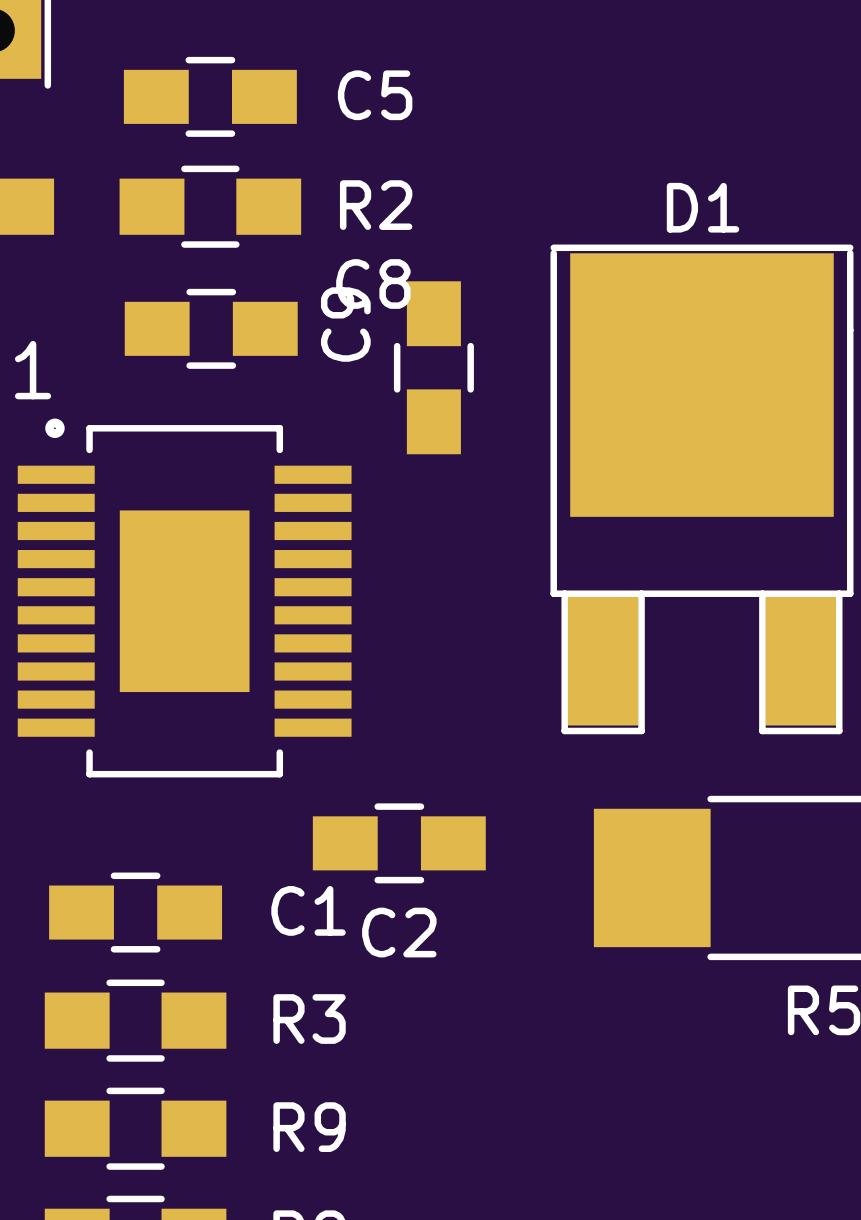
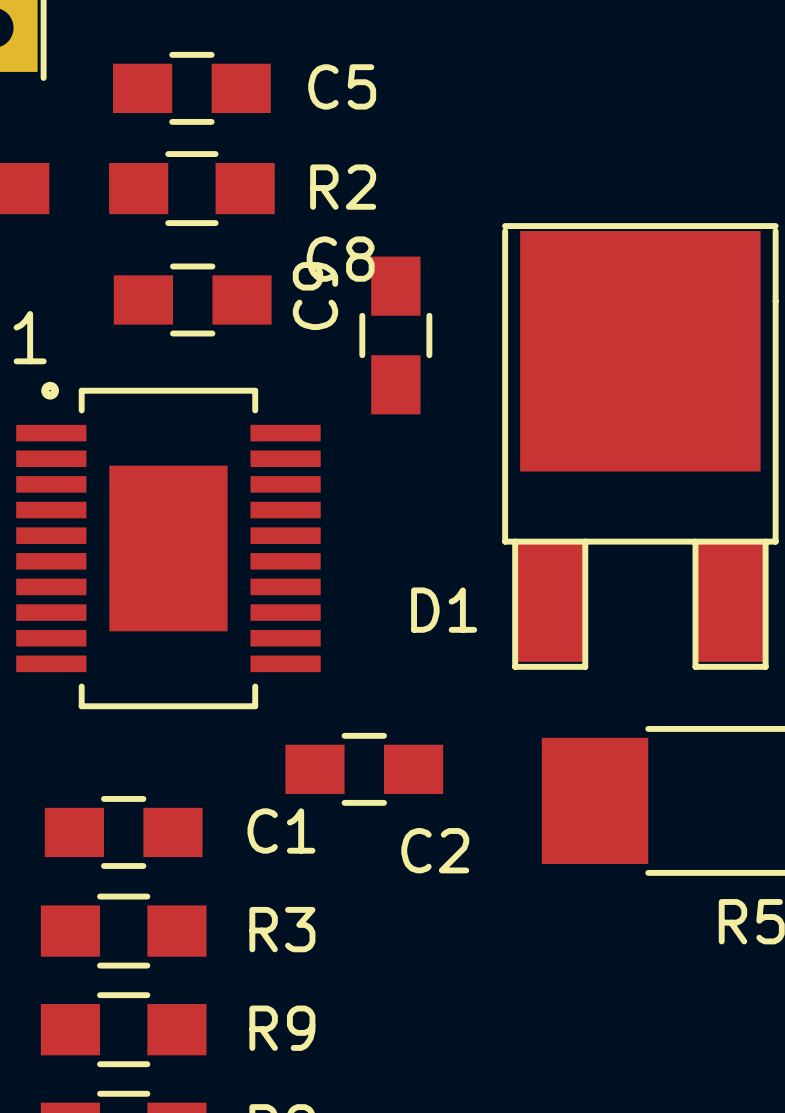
D1 name position: D1 (703, 207) -> D1 (444, 610)
C2 name position: C2 (399, 932) -> C2 (435, 850)

